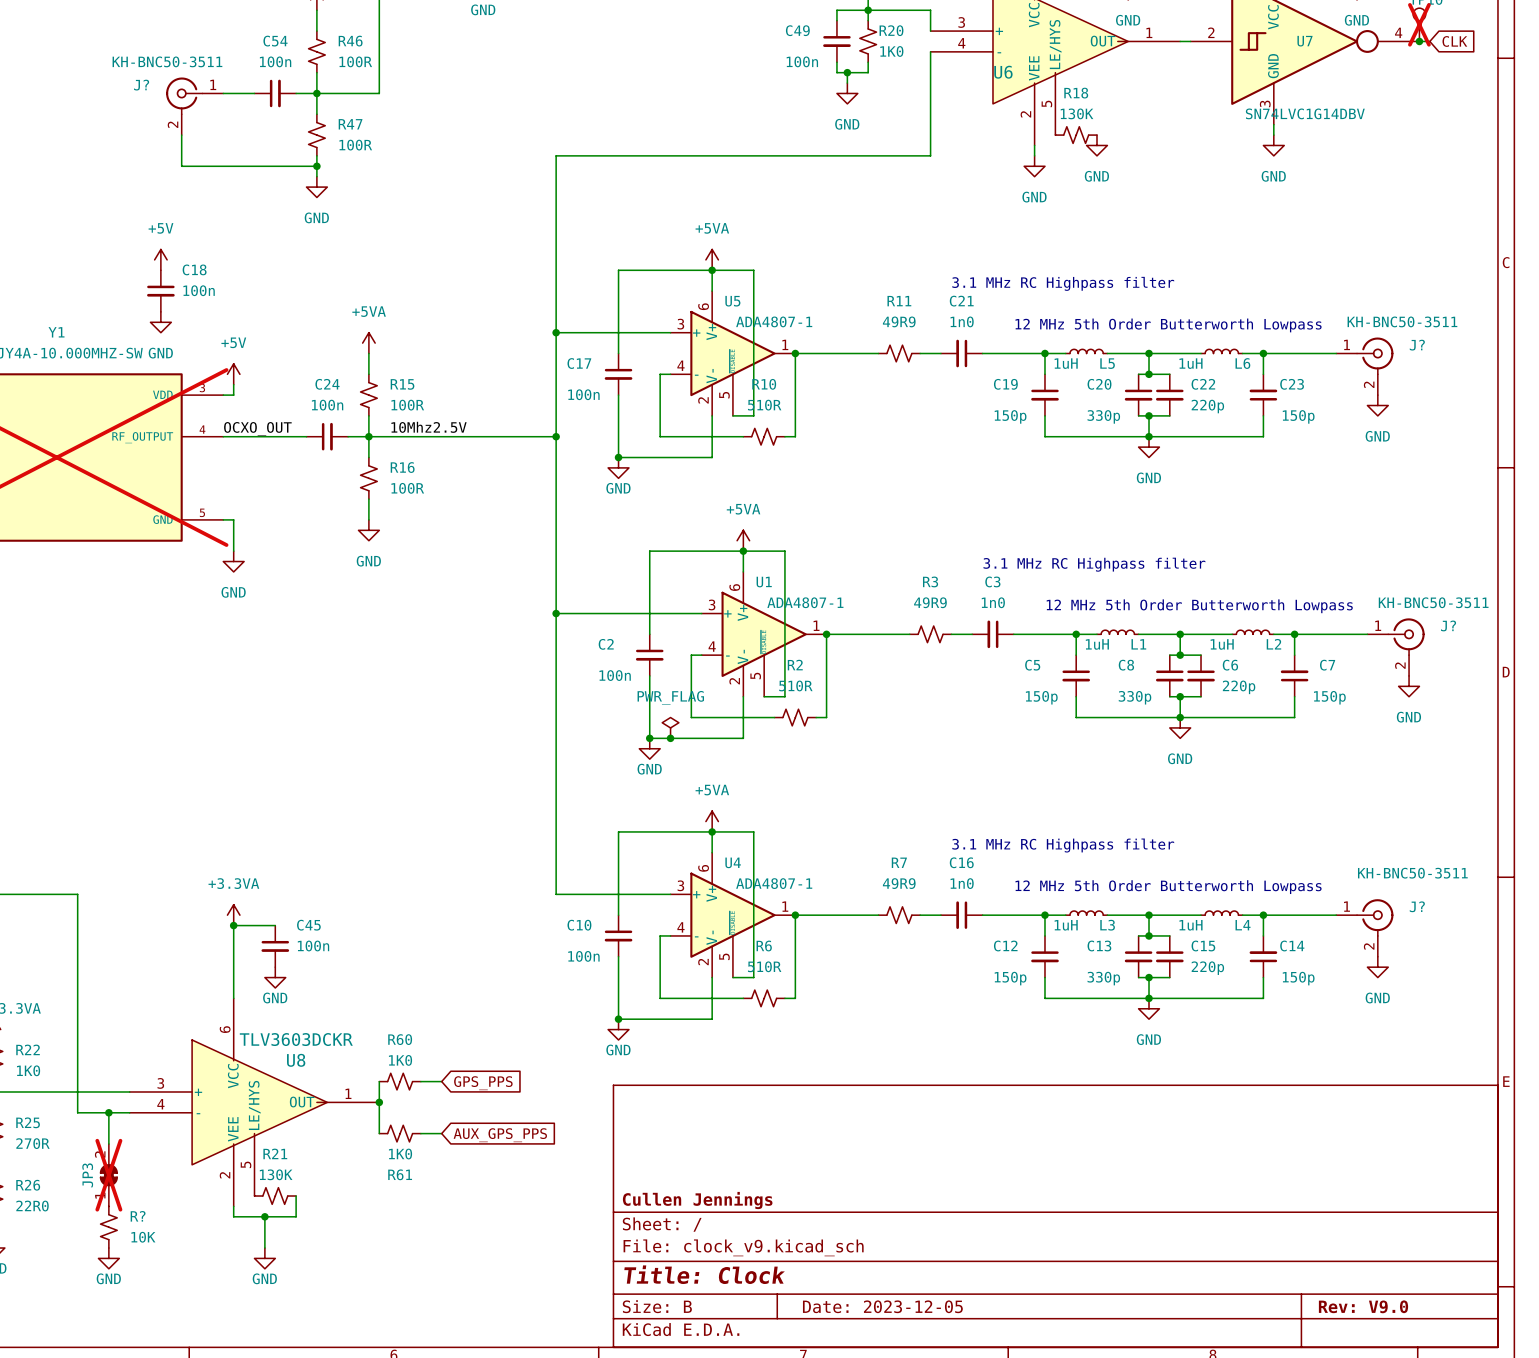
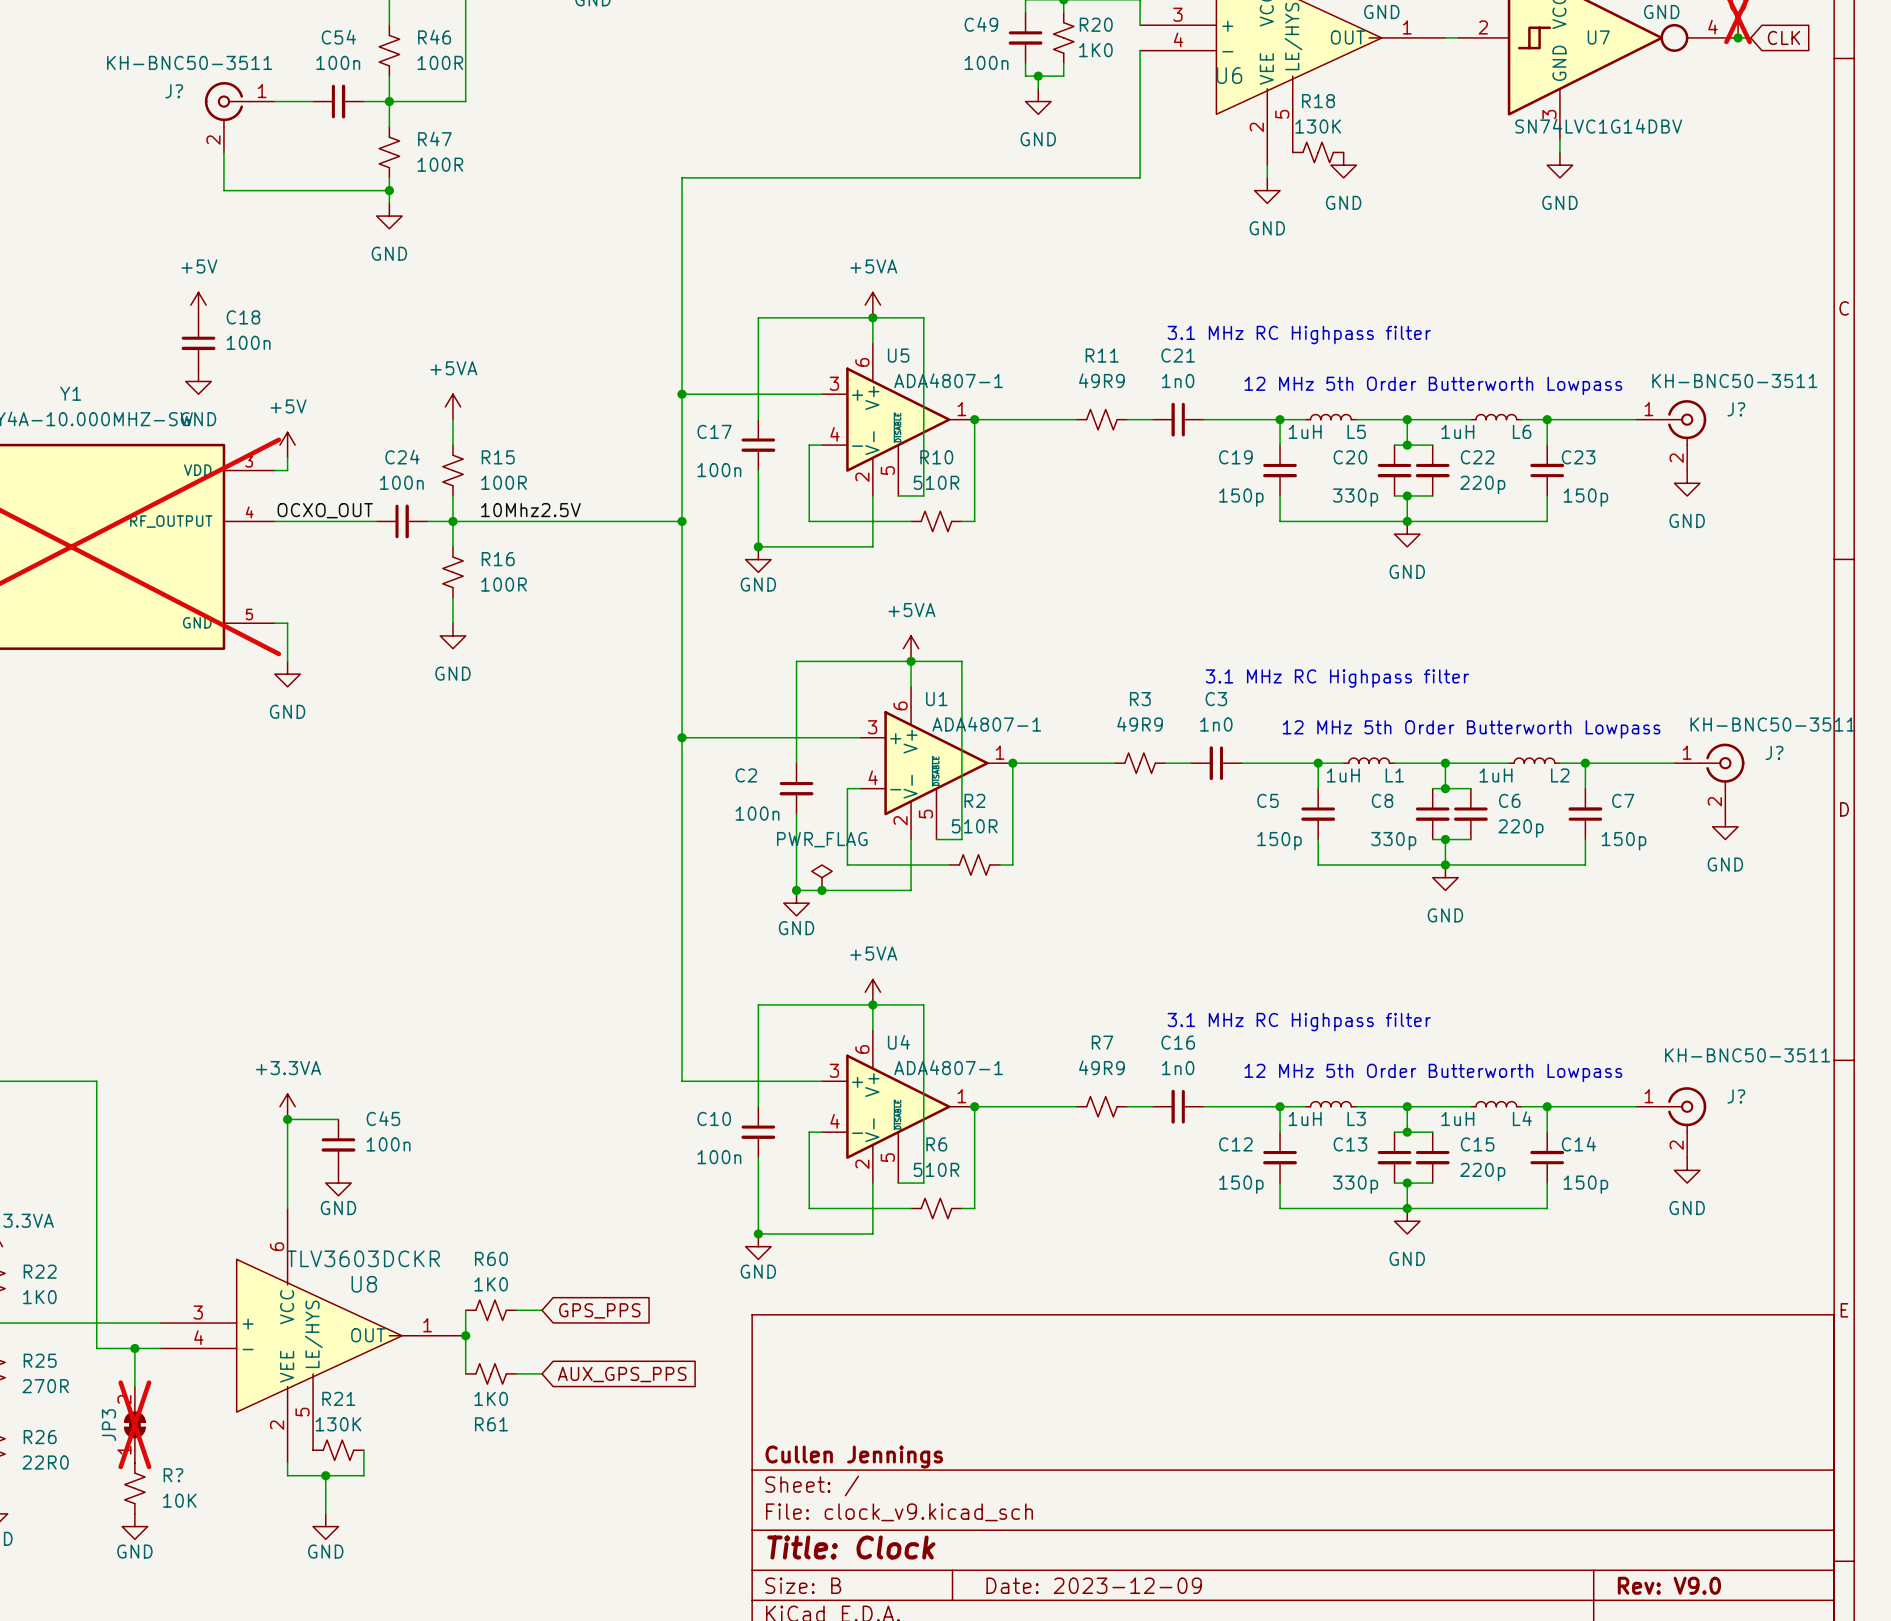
title block: Date: 2023-12-05 (882, 1306) -> Date: 2023-12-09 (1094, 1585)

